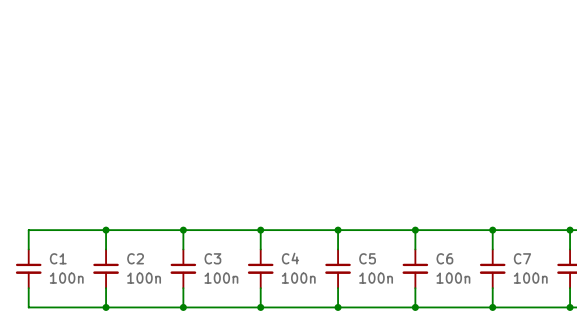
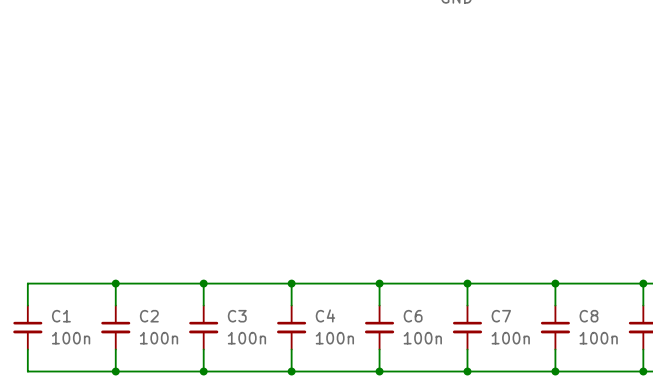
C5 name: C5 (367, 258) -> C6 (413, 316)
C6 name: C6 (444, 258) -> C7 (501, 316)
C7 name: C7 (522, 258) -> C8 (589, 316)

